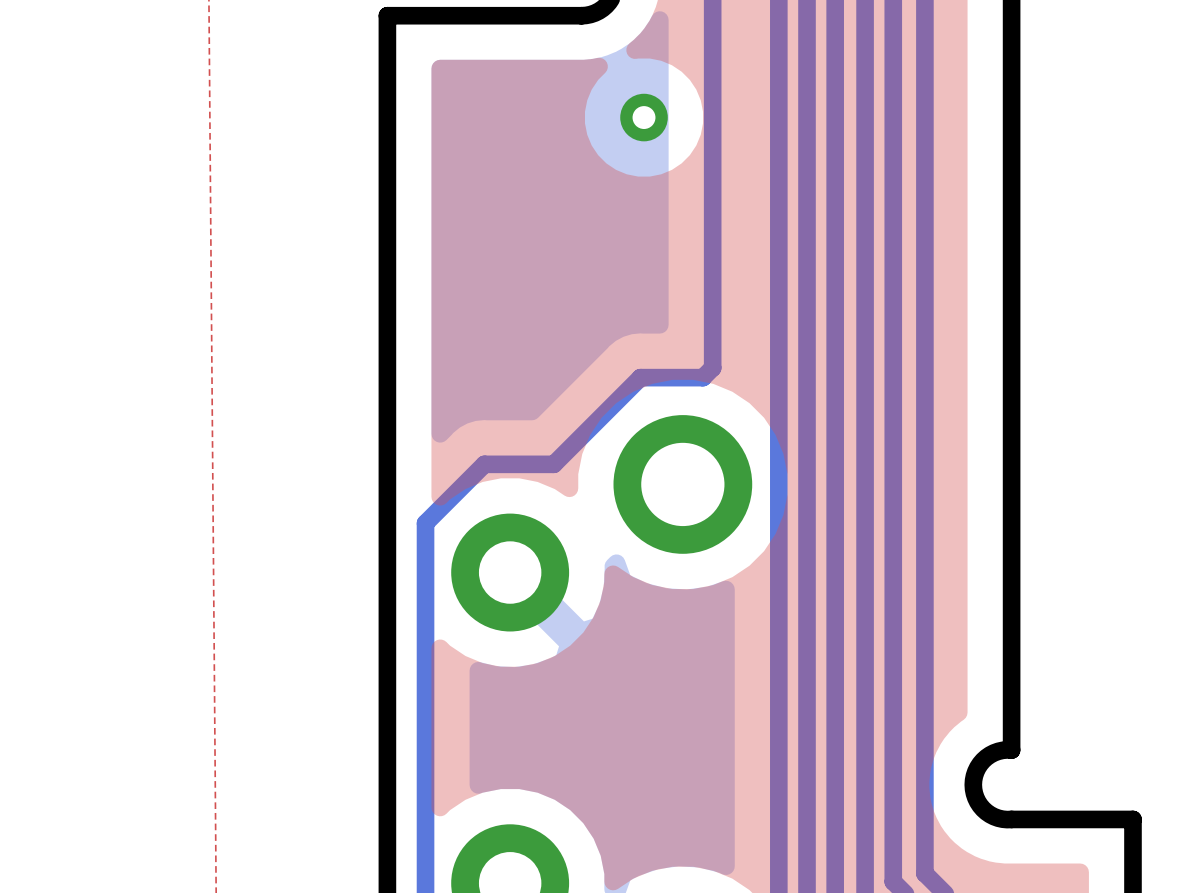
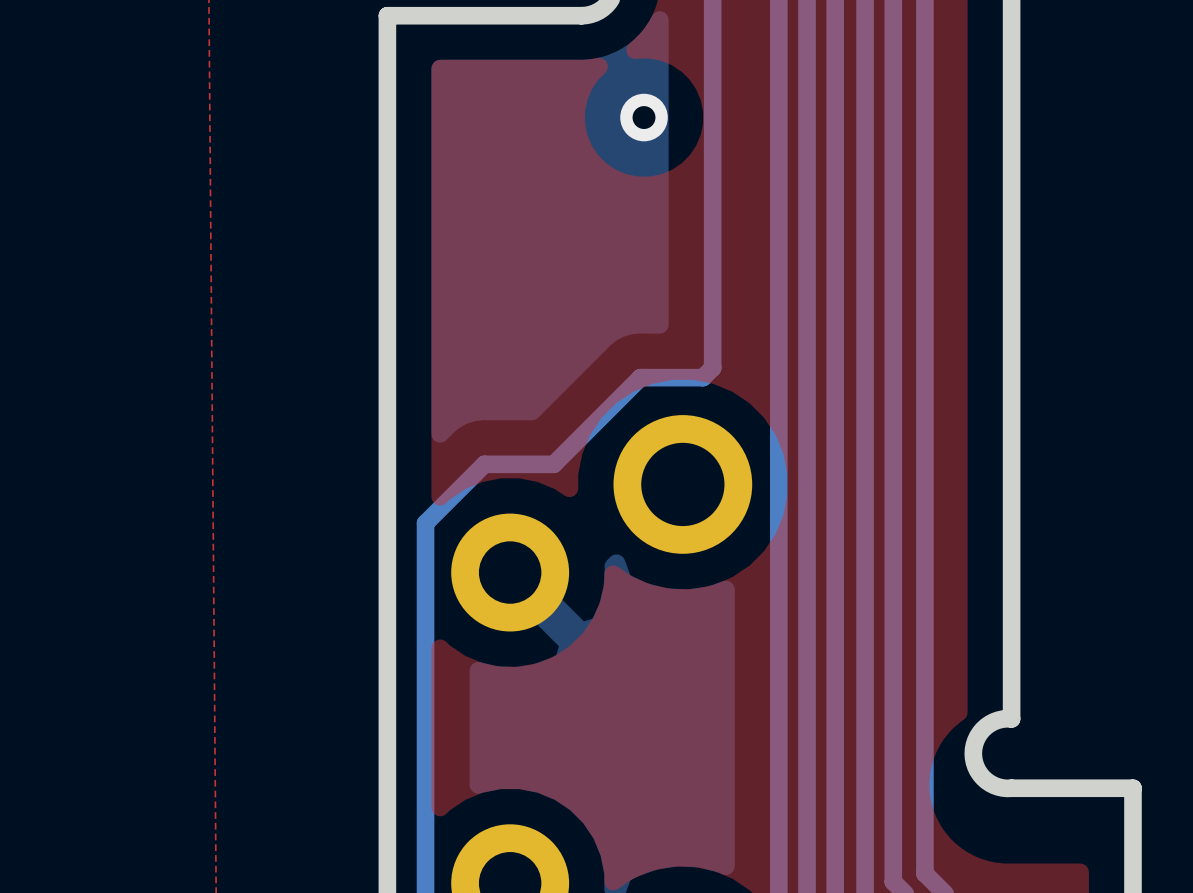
board edge: (1011, 718) (1011, 750) (998, 751) (986, 757) (980, 763) (974, 775) (974, 793) (977, 801) (986, 812) (994, 816) (1007, 819) (1132, 819) -> (1011, 718) (998, 720) (990, 723) (980, 732) (975, 740) (973, 749) (974, 762) (977, 770) (986, 780) (994, 785) (1007, 788) (1132, 788) (1132, 819)

